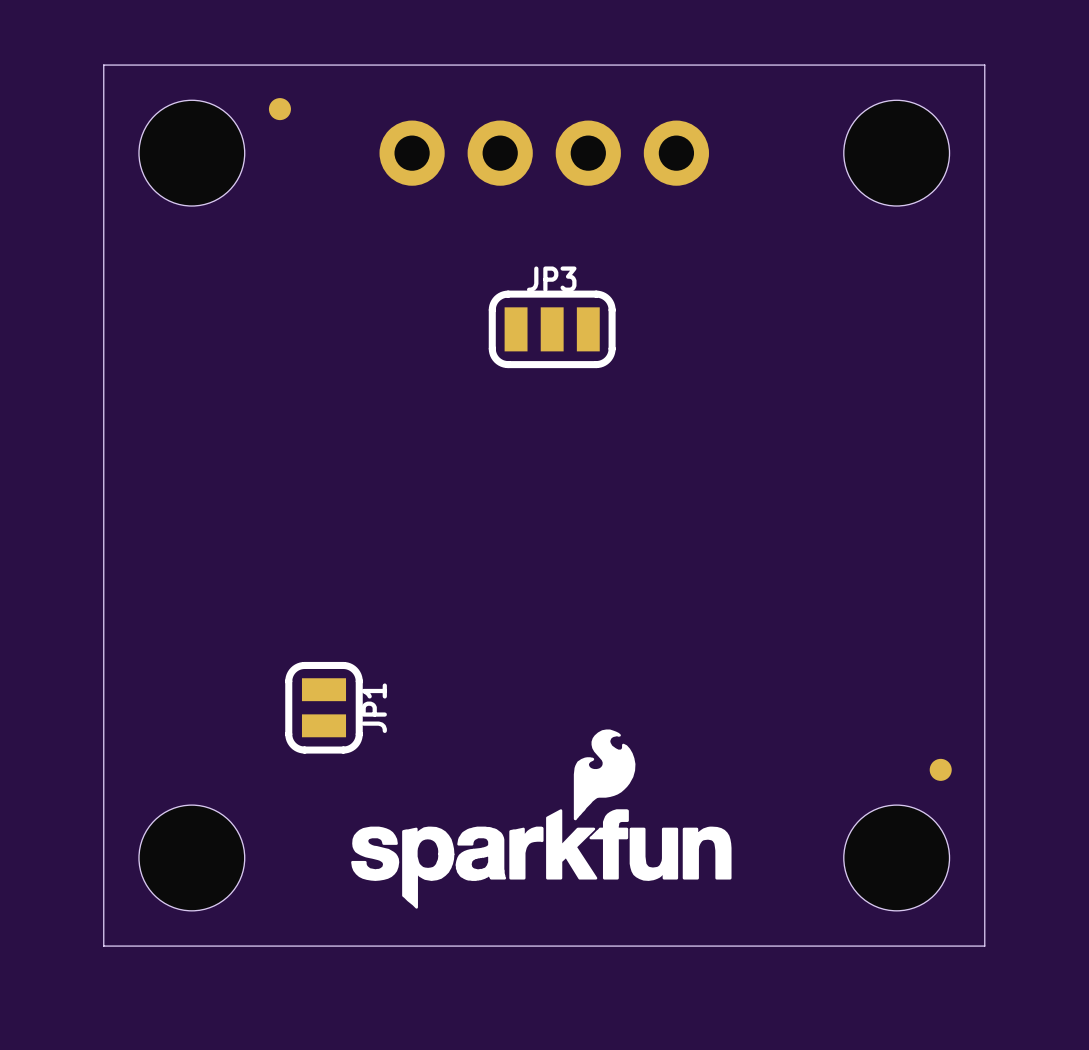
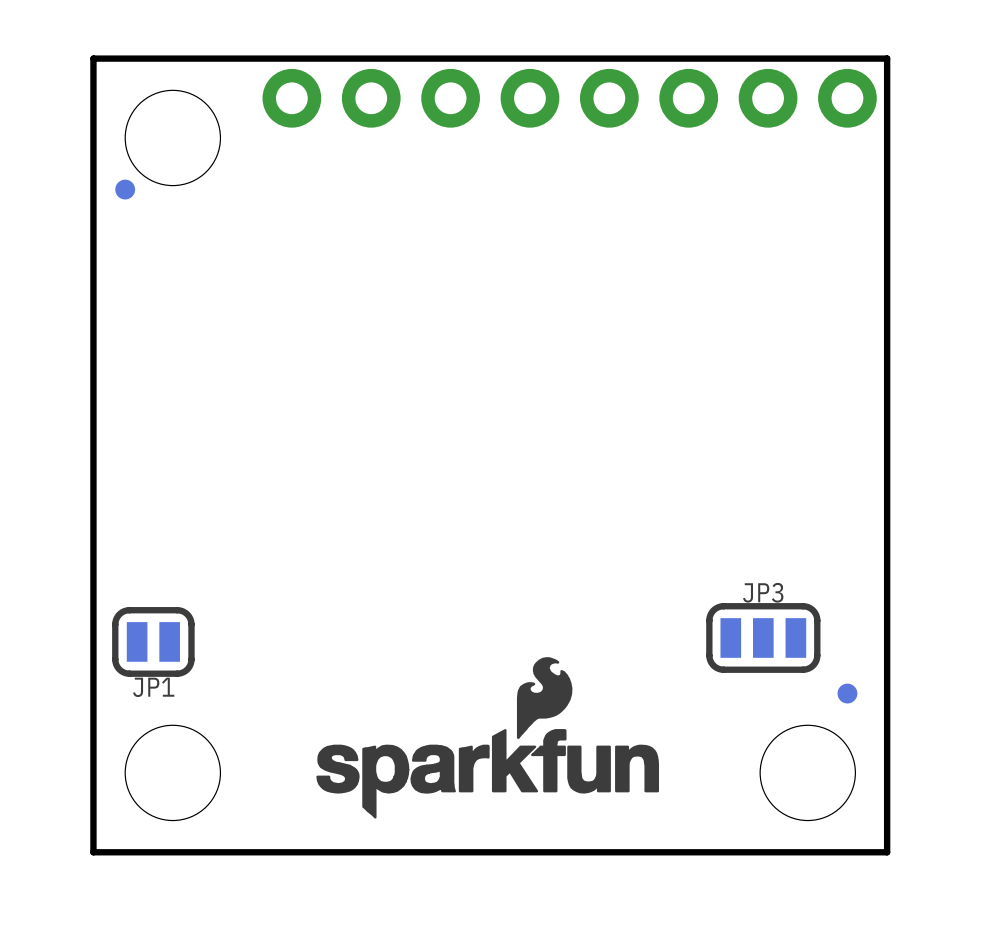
board edge width: thin (984, 65) (103, 65) (103, 946) (984, 946) (984, 65) -> thick (887, 58) (93, 58) (93, 852) (887, 852) (887, 58)
part position: (279, 109) -> (125, 189)
part: none -> (728, 98)
part position: (544, 153) -> (410, 98)
part: (896, 153) -> none
JP3 position: (552, 329) -> (763, 637)
JP1 rotation: 0° (324, 707) -> 90° clockwise (153, 641)
JP1 position: (324, 707) -> (153, 641)

